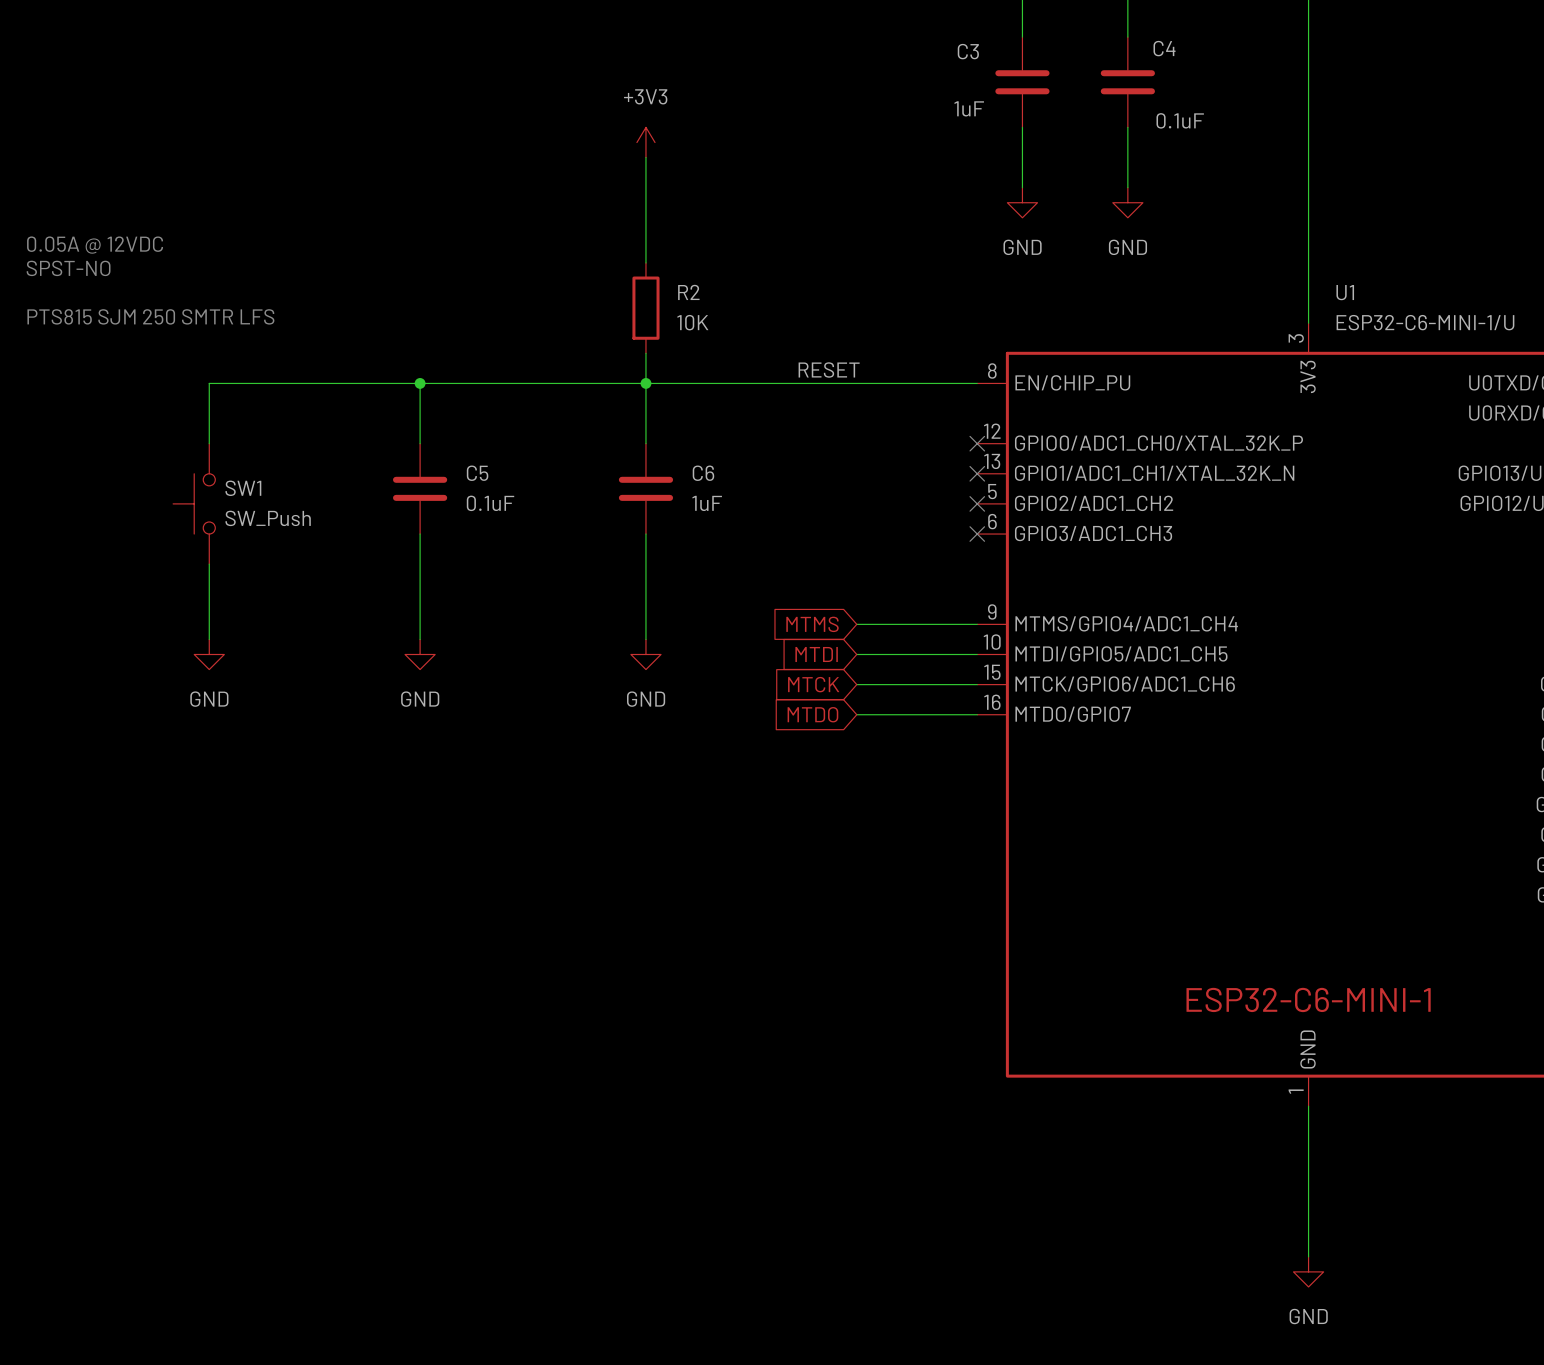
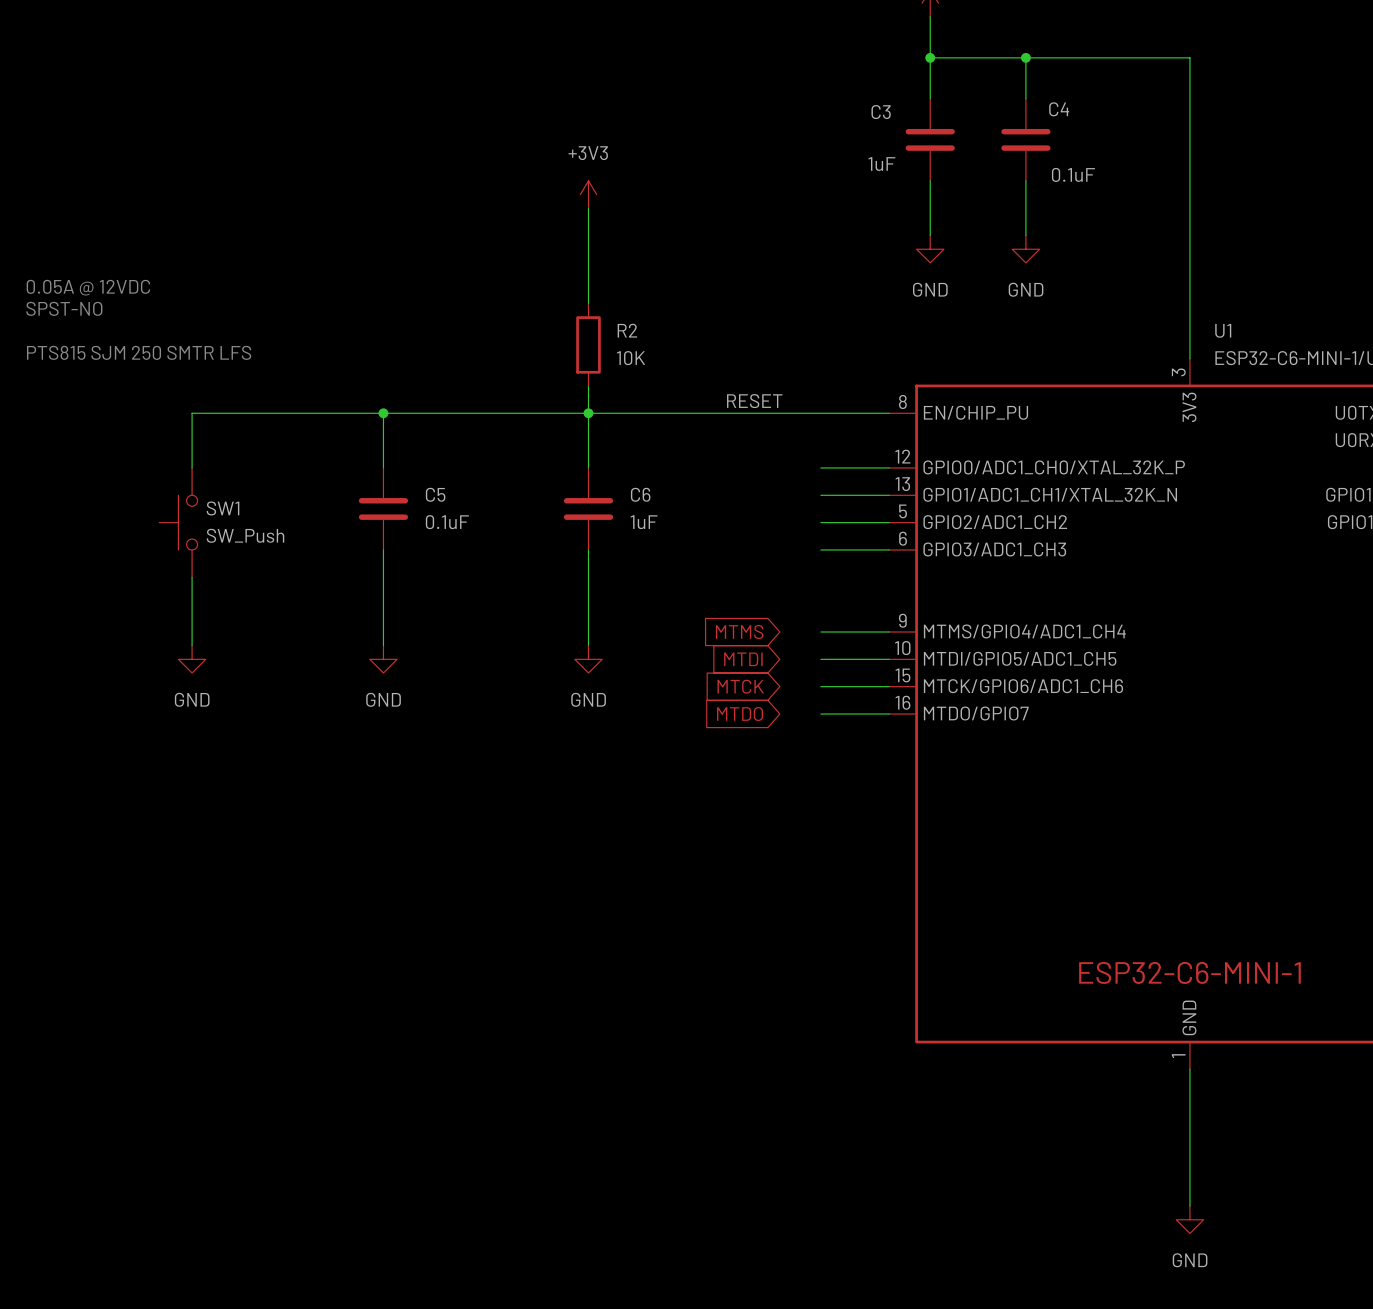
wire: none -> (820, 467) (889, 467)
no-connect mark: (977, 443) -> none
wire: none -> (820, 495) (889, 495)
no-connect mark: (977, 473) -> none
wire: none -> (820, 522) (889, 522)
no-connect mark: (977, 503) -> none
wire: none -> (820, 549) (889, 549)
no-connect mark: (977, 534) -> none
wire: (856, 624) (901, 624) -> none
wire: (856, 654) (901, 654) -> none
wire: (856, 684) (901, 684) -> none
wire: (856, 714) (901, 714) -> none

